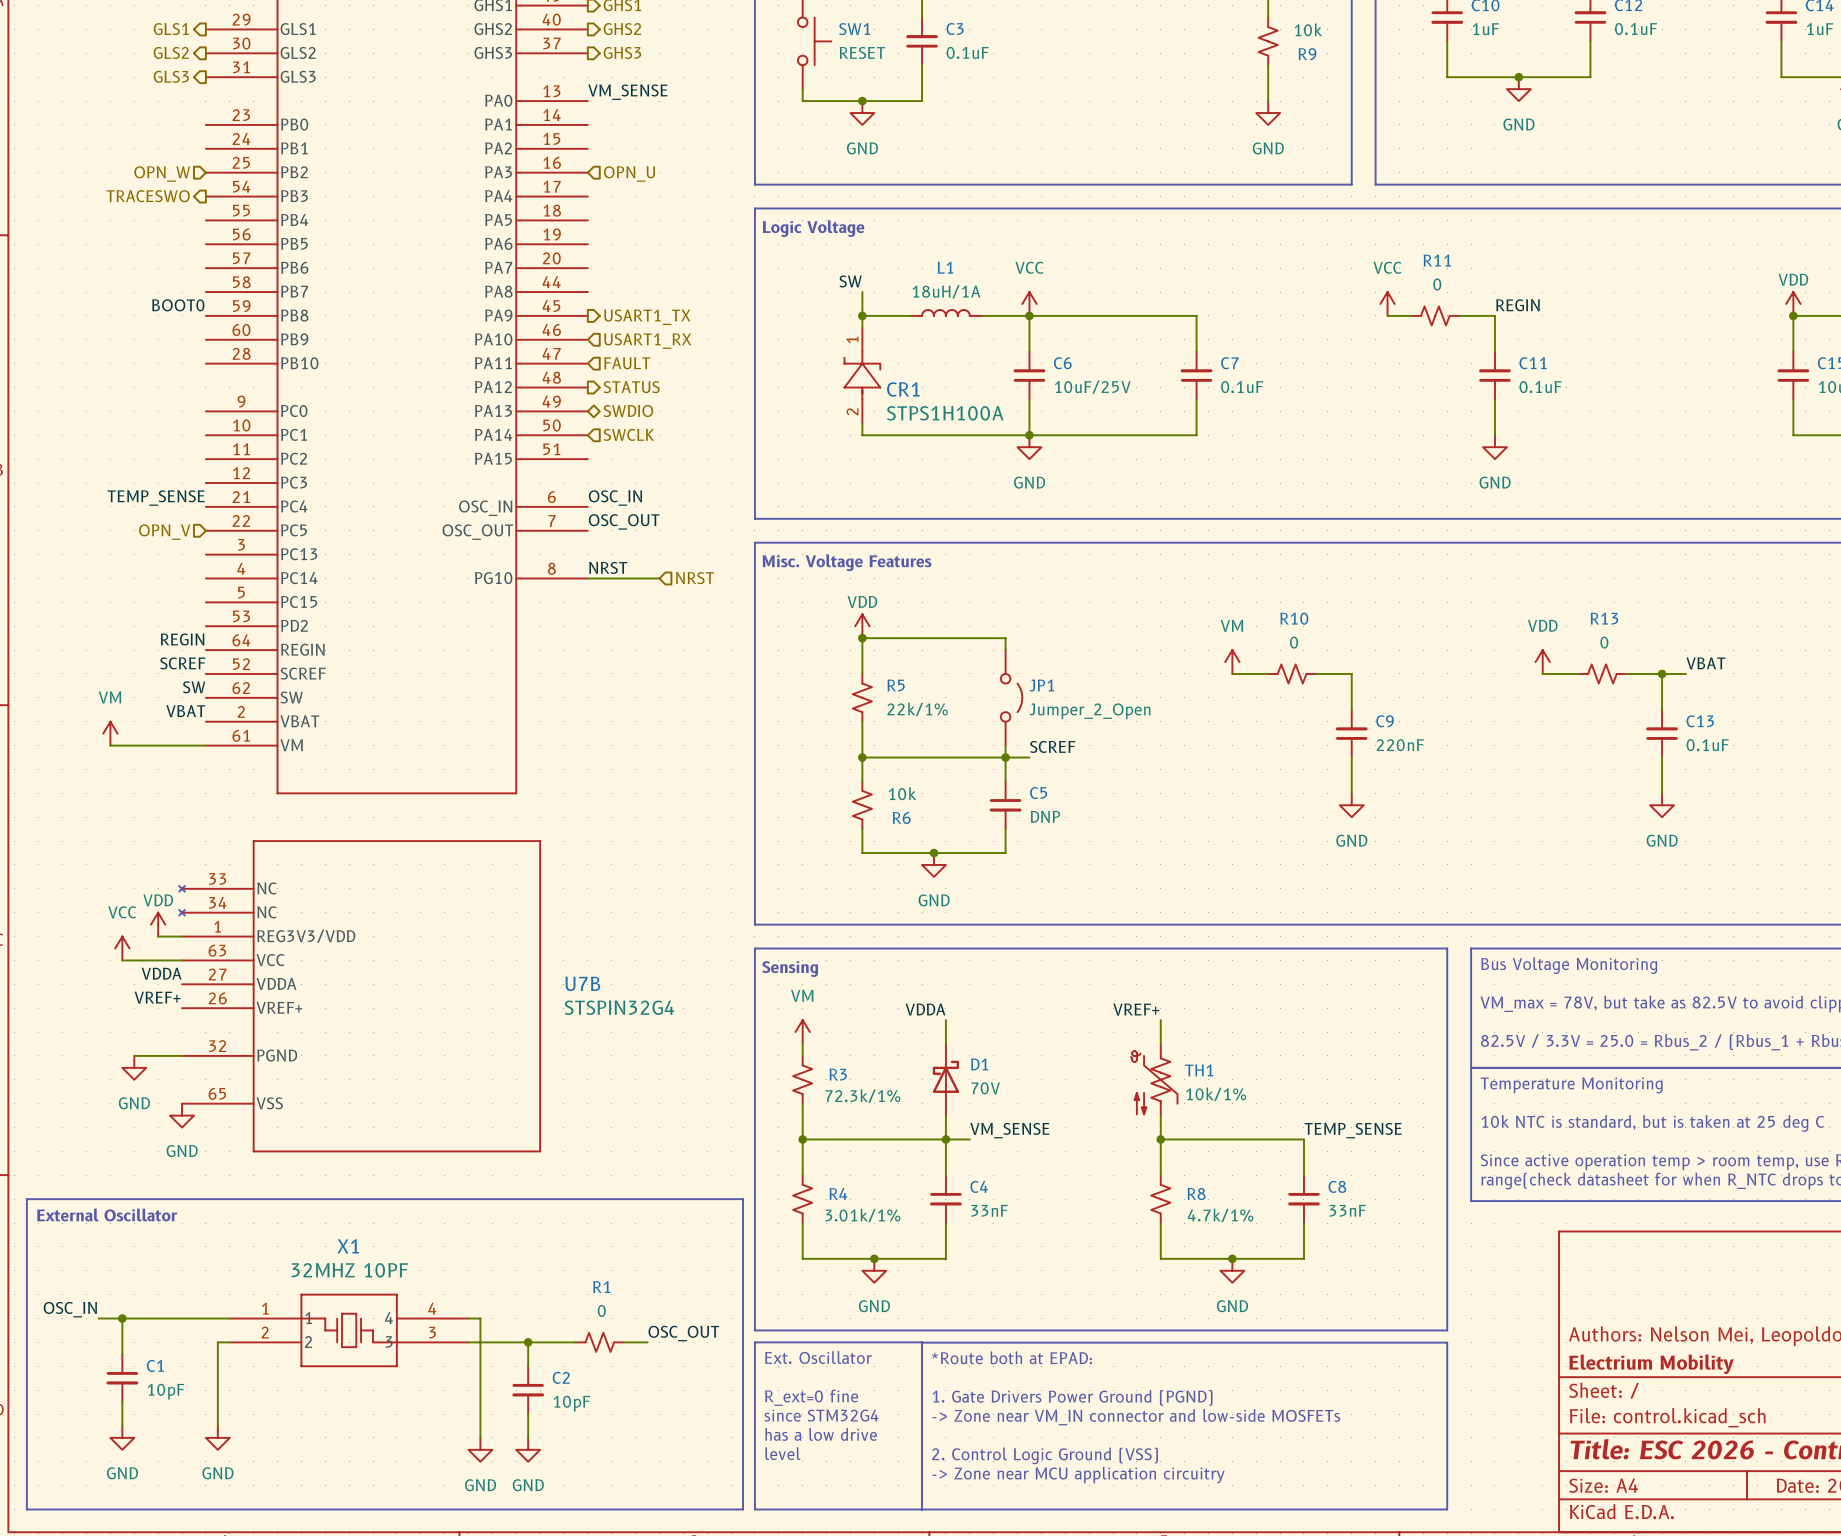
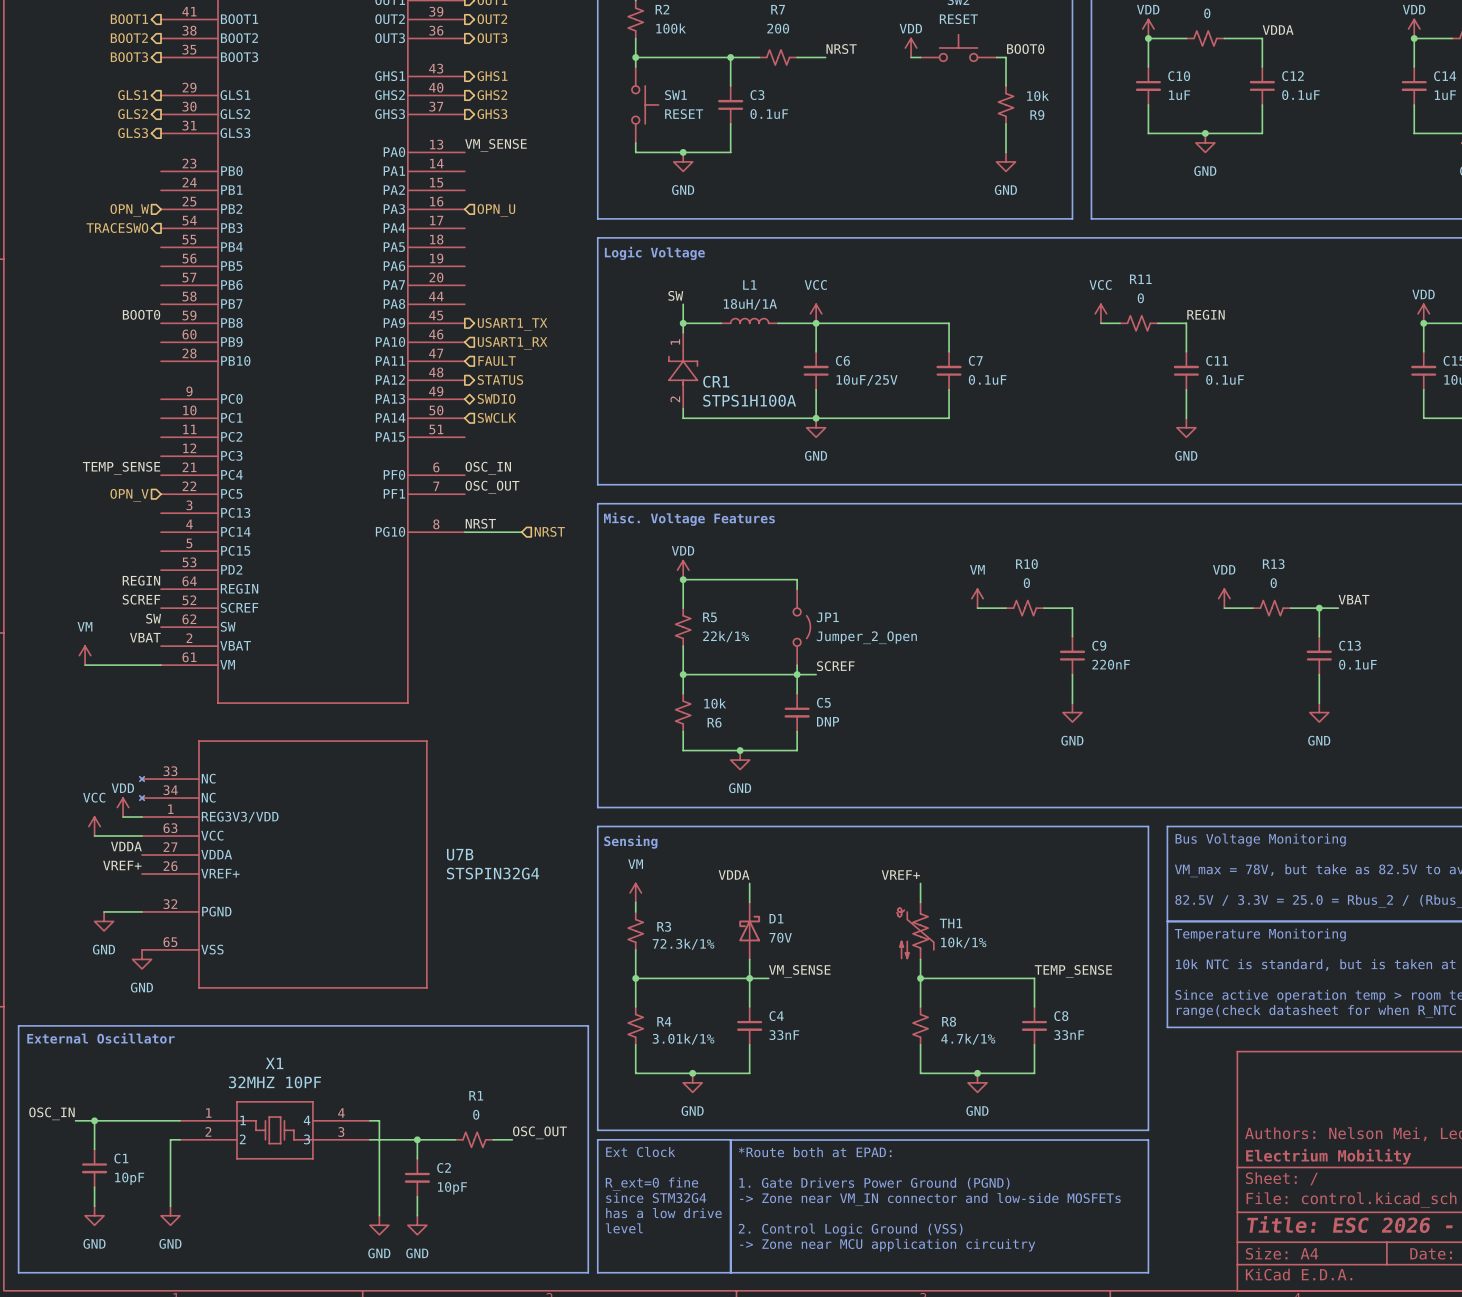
part pin name: OSC_IN (485, 508) -> PF0 (394, 474)
part pin name: OSC_OUT (477, 532) -> PF1 (394, 493)
text: Ext. Oscillator (818, 1357) -> Ext Clock (640, 1151)

